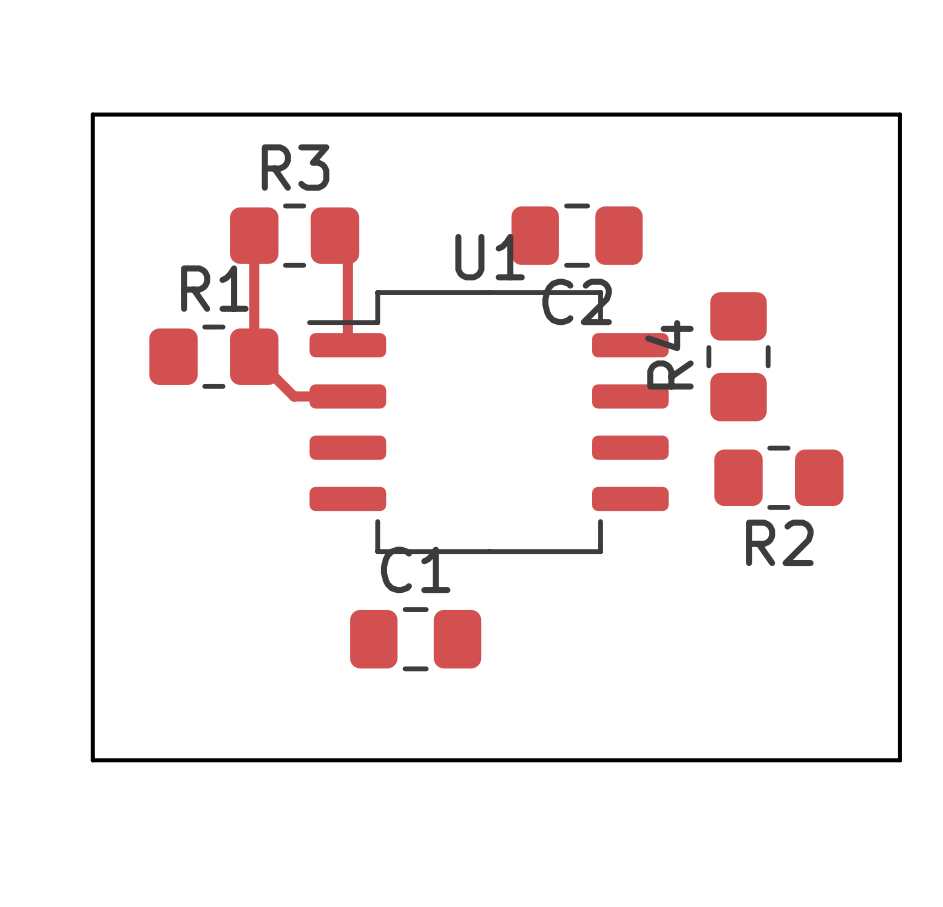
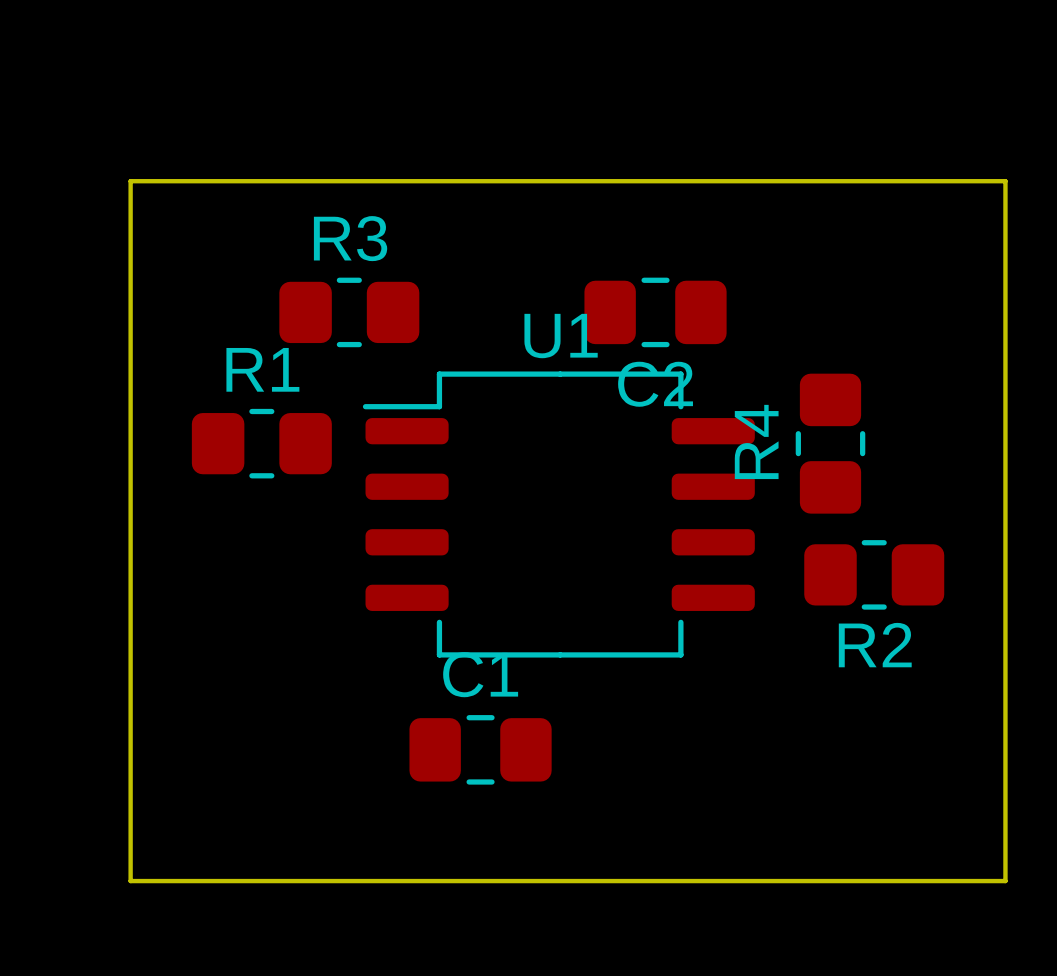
track: (254, 235) (254, 356) (293, 396) (347, 396) -> none
track: (334, 235) (347, 248) (347, 345) -> none

